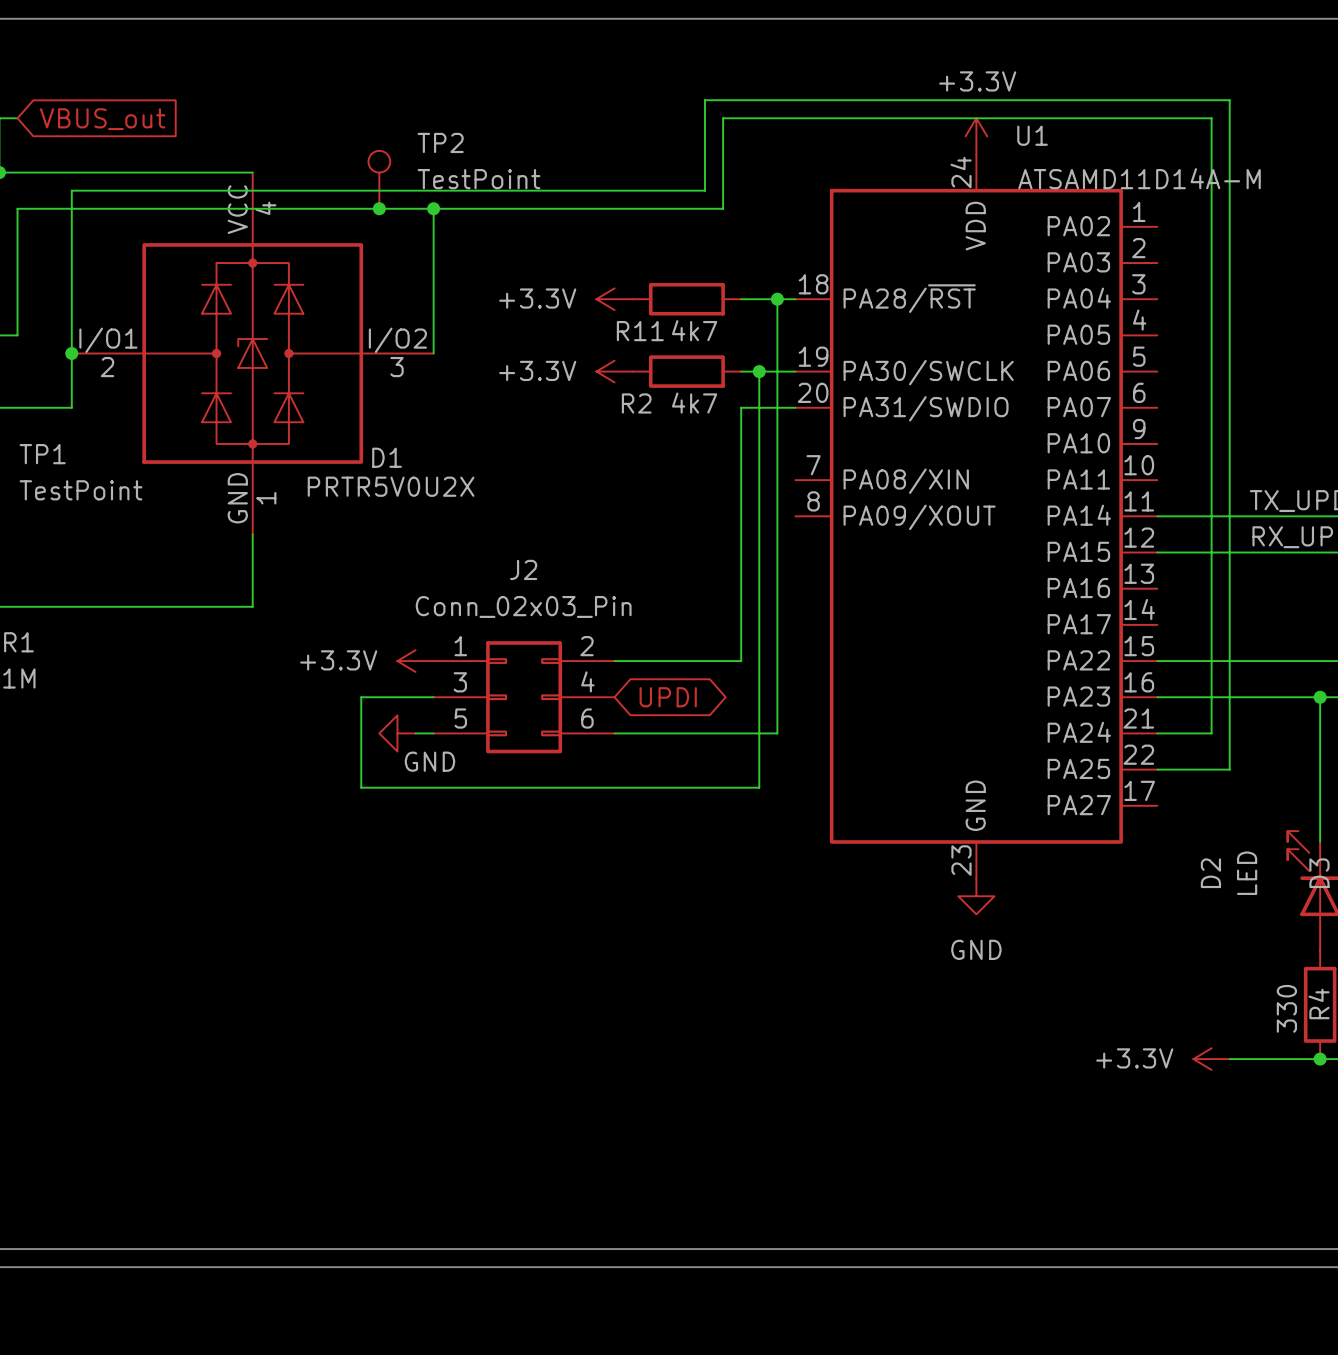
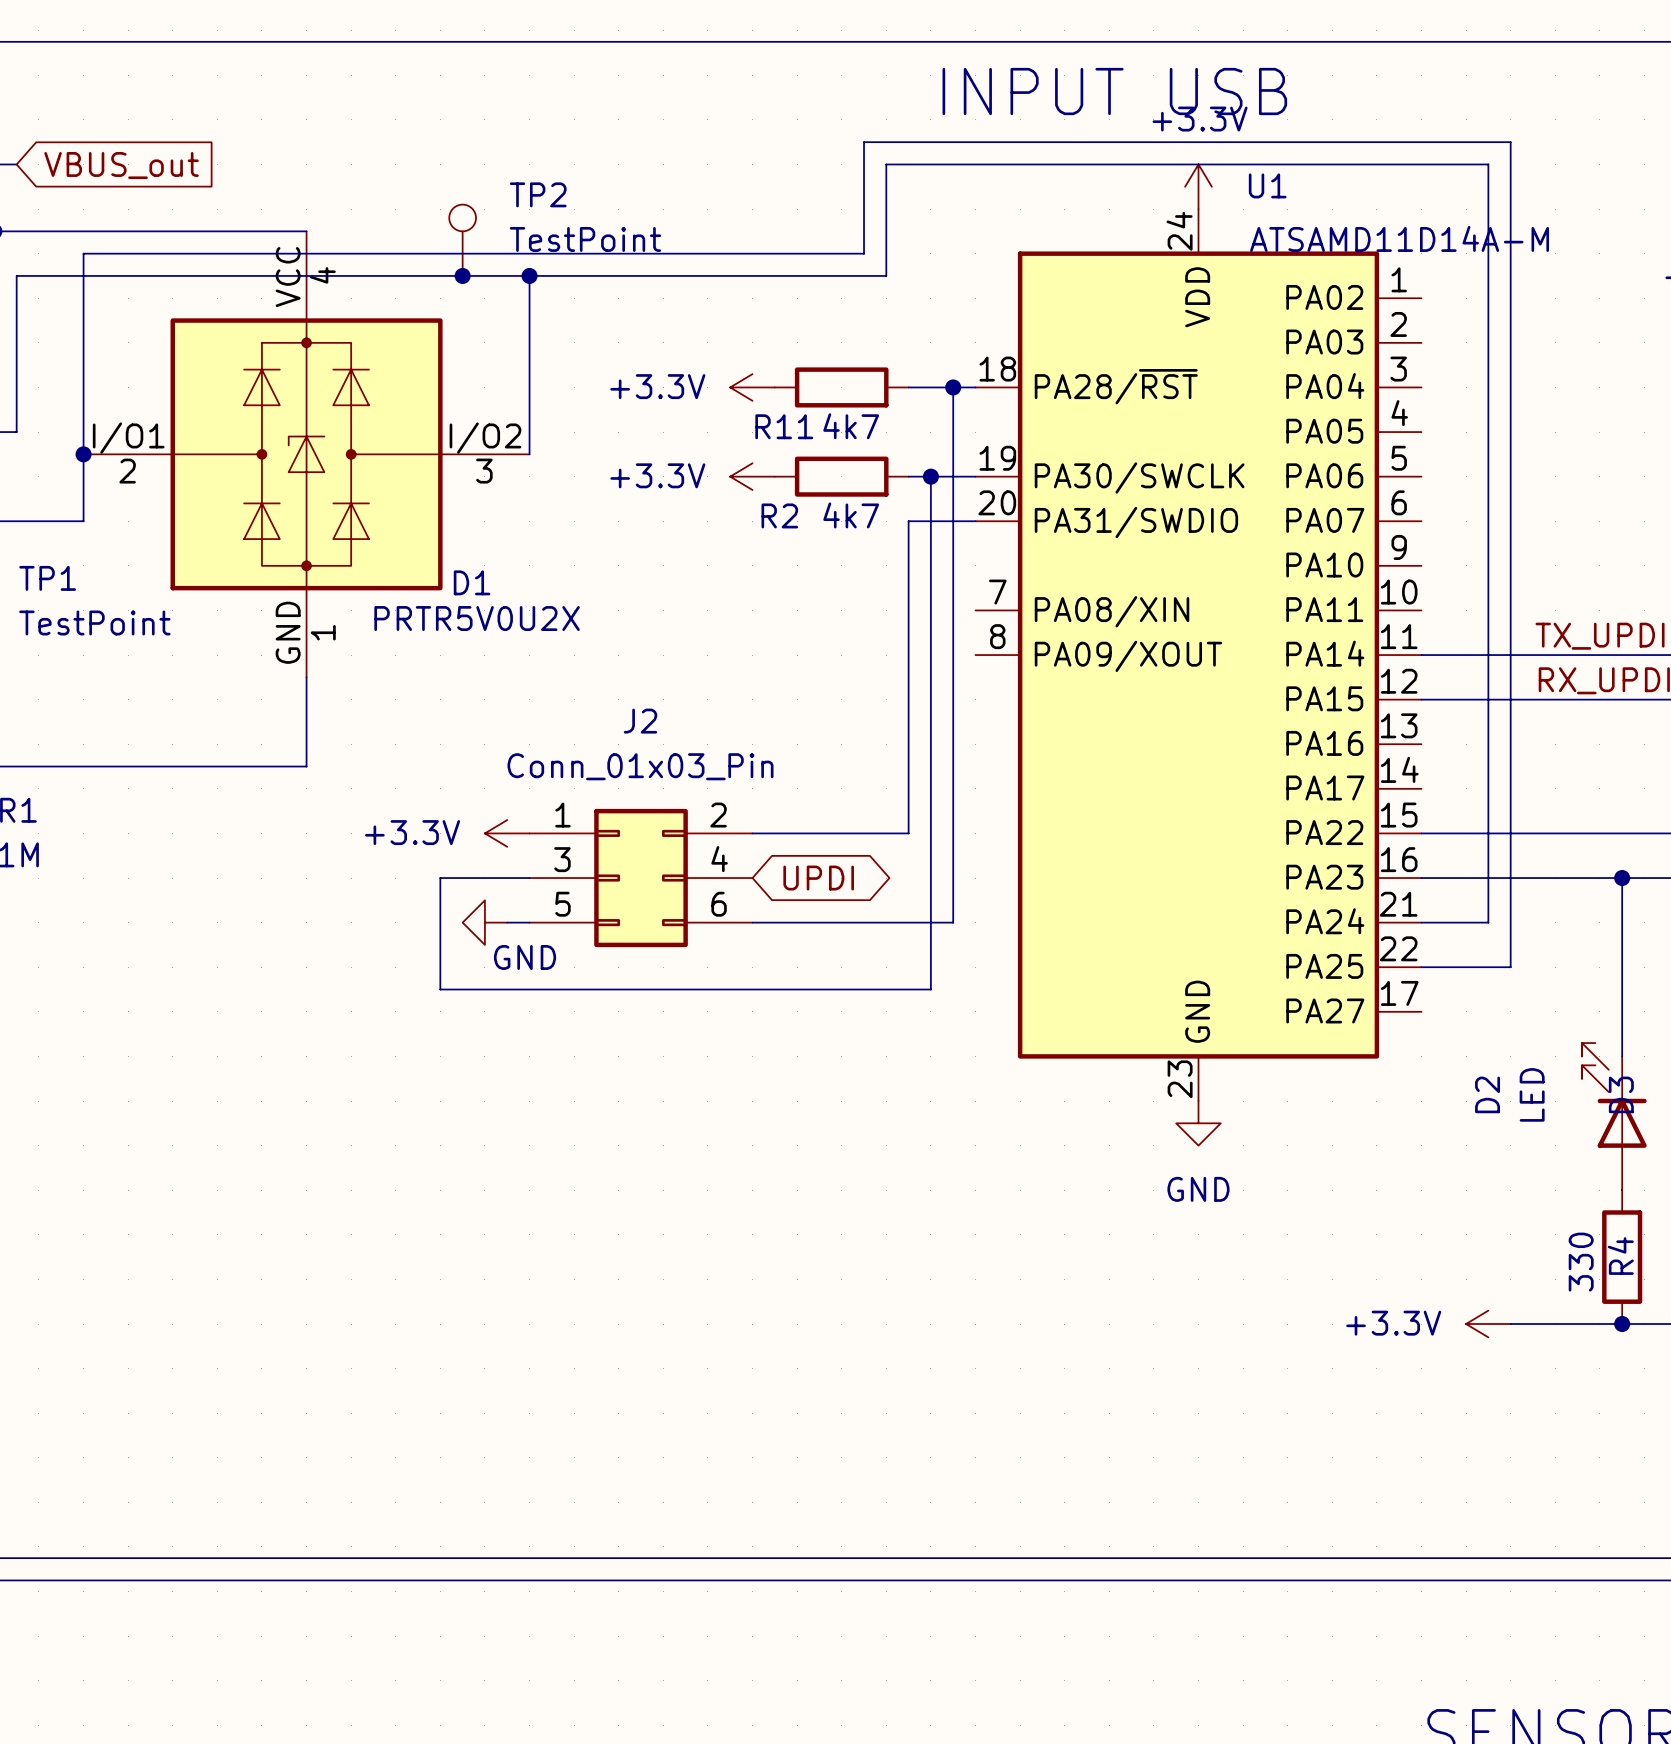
text: none -> INPUT USB (1114, 91)
J2 value: Conn_02x03_Pin (523, 606) -> Conn_01x03_Pin (640, 766)

